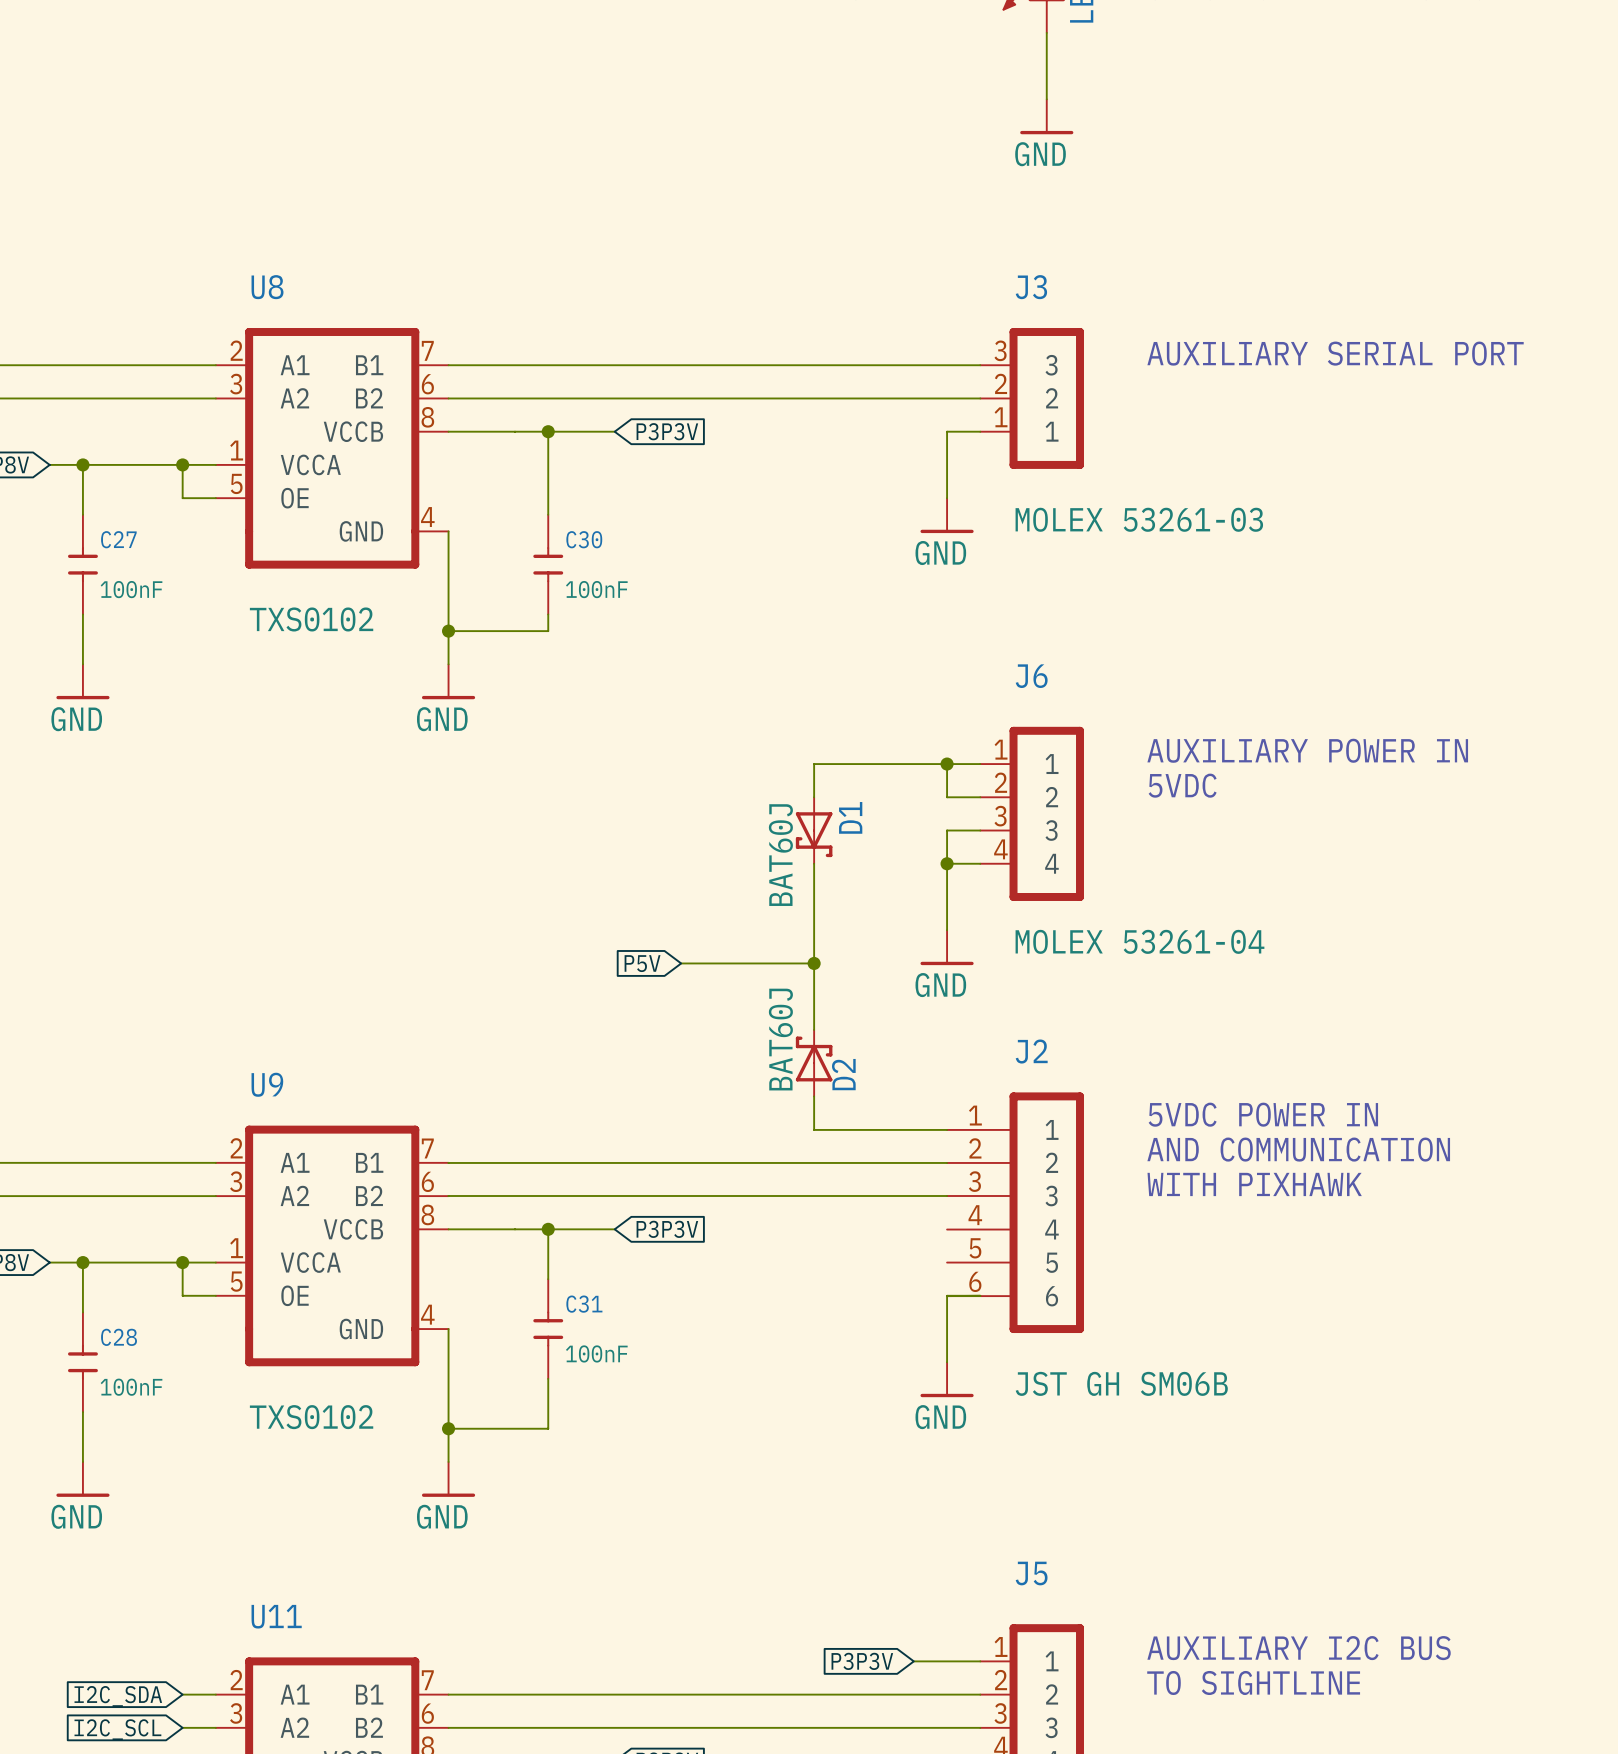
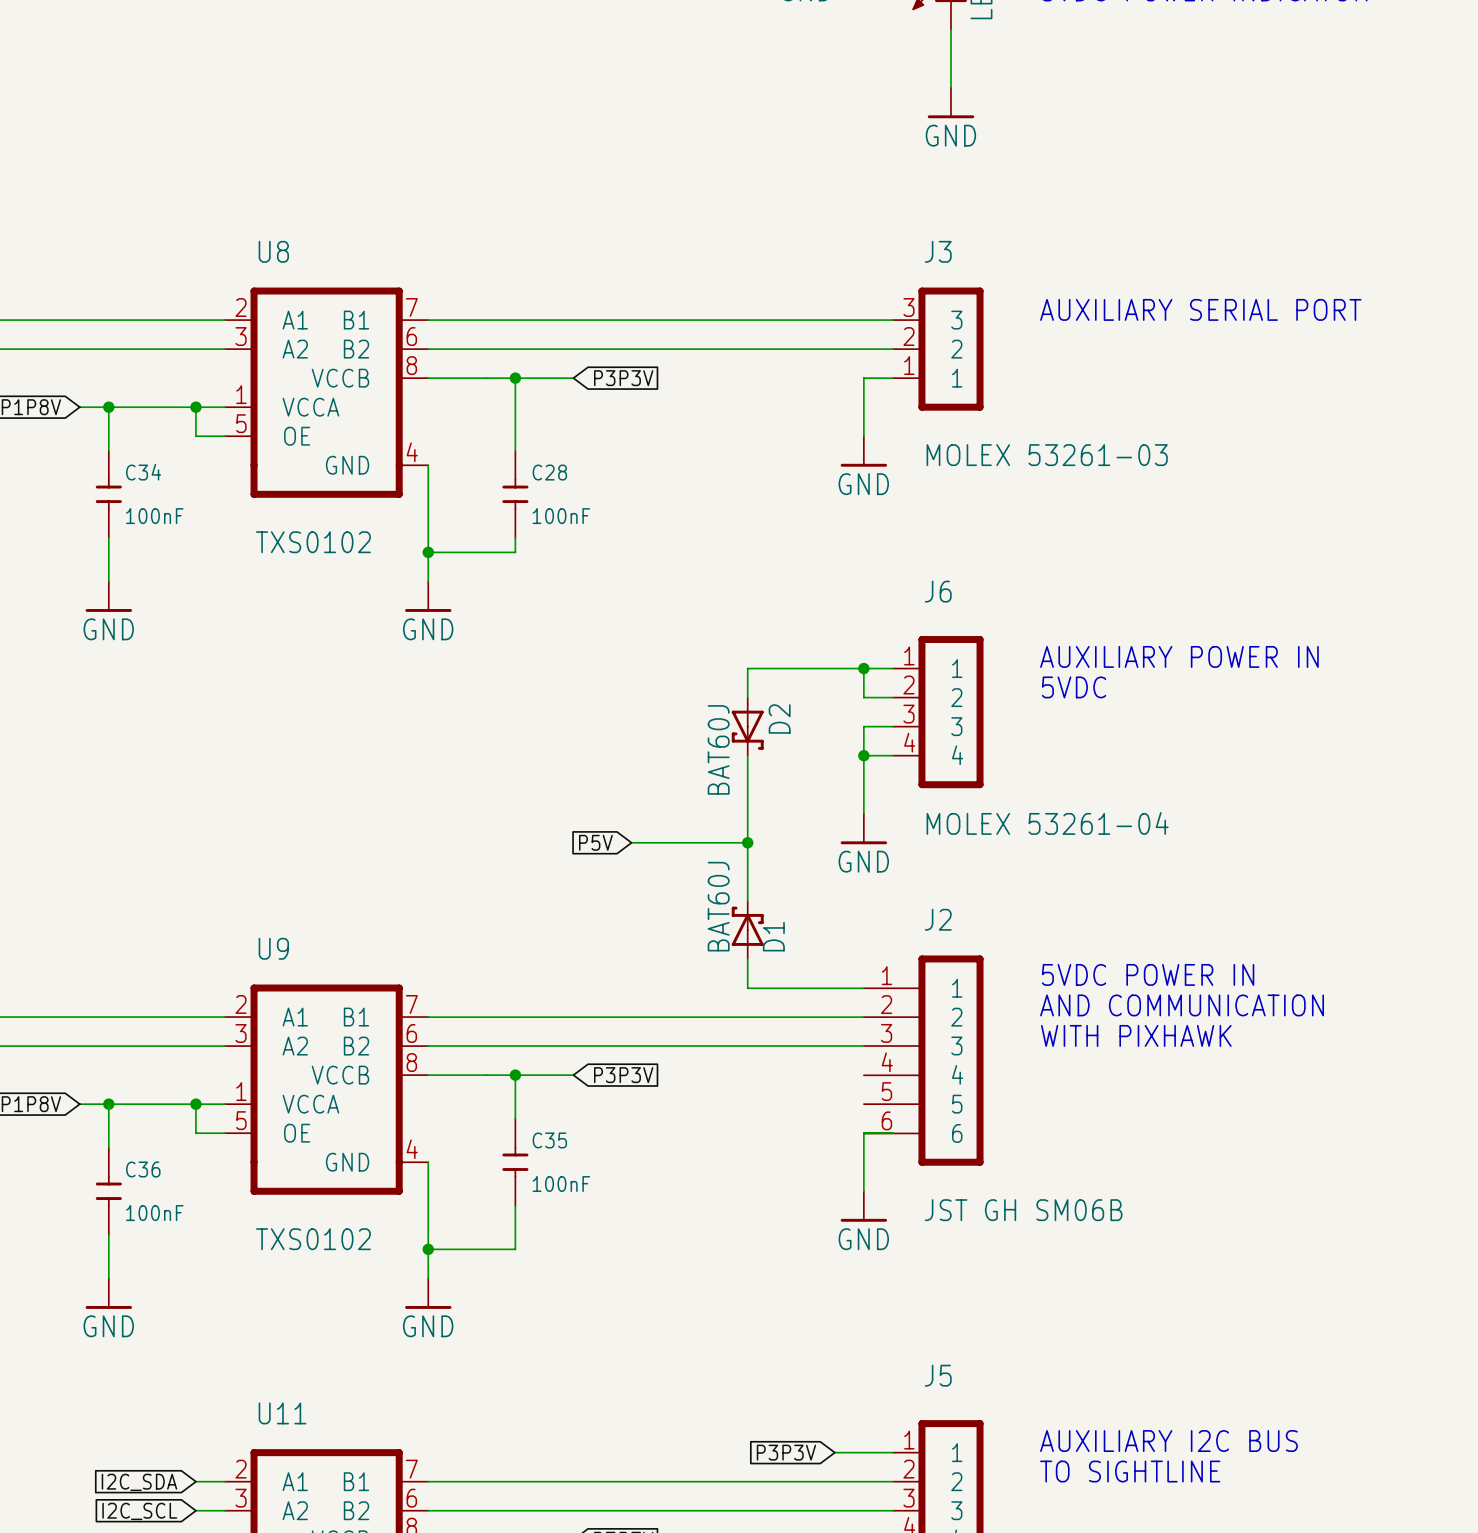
C27 name: C27 (118, 539) -> C34 (143, 472)
C30 name: C30 (584, 539) -> C28 (549, 472)
D1 name: D1 (850, 817) -> D2 (779, 718)
D2 name: D2 (843, 1074) -> D1 (773, 936)
C31 name: C31 (584, 1304) -> C35 (549, 1140)
C28 name: C28 (119, 1337) -> C36 (143, 1169)

